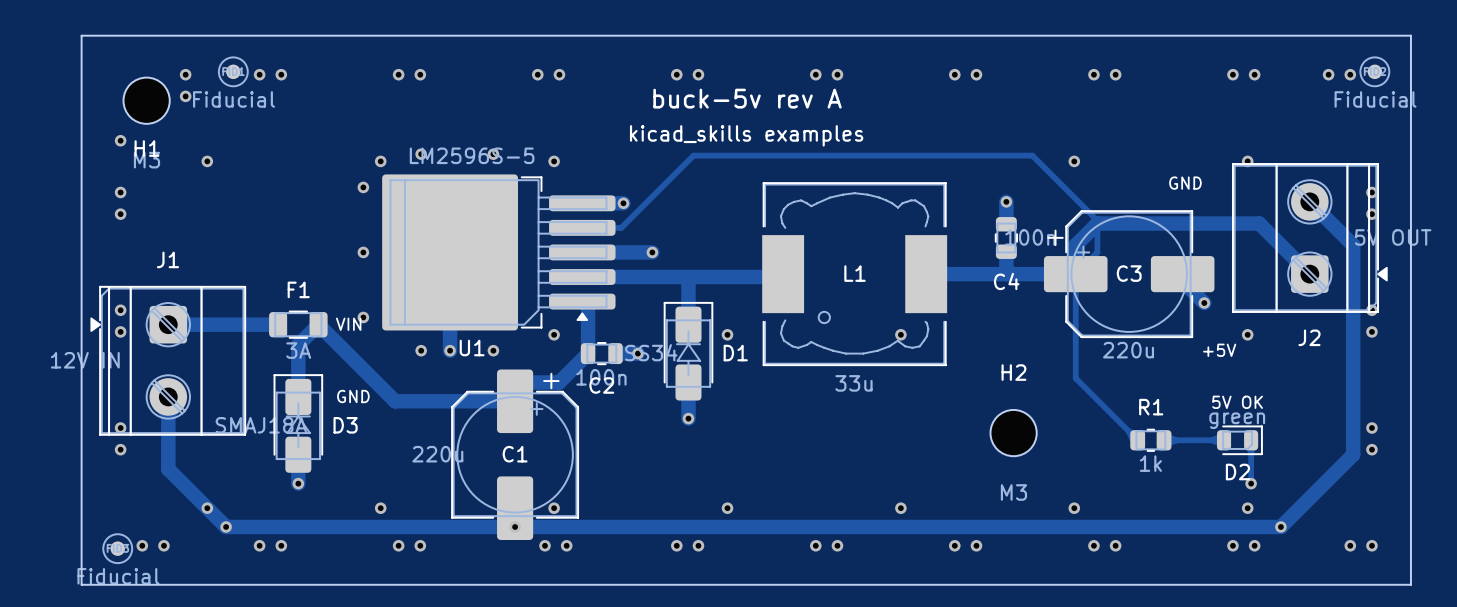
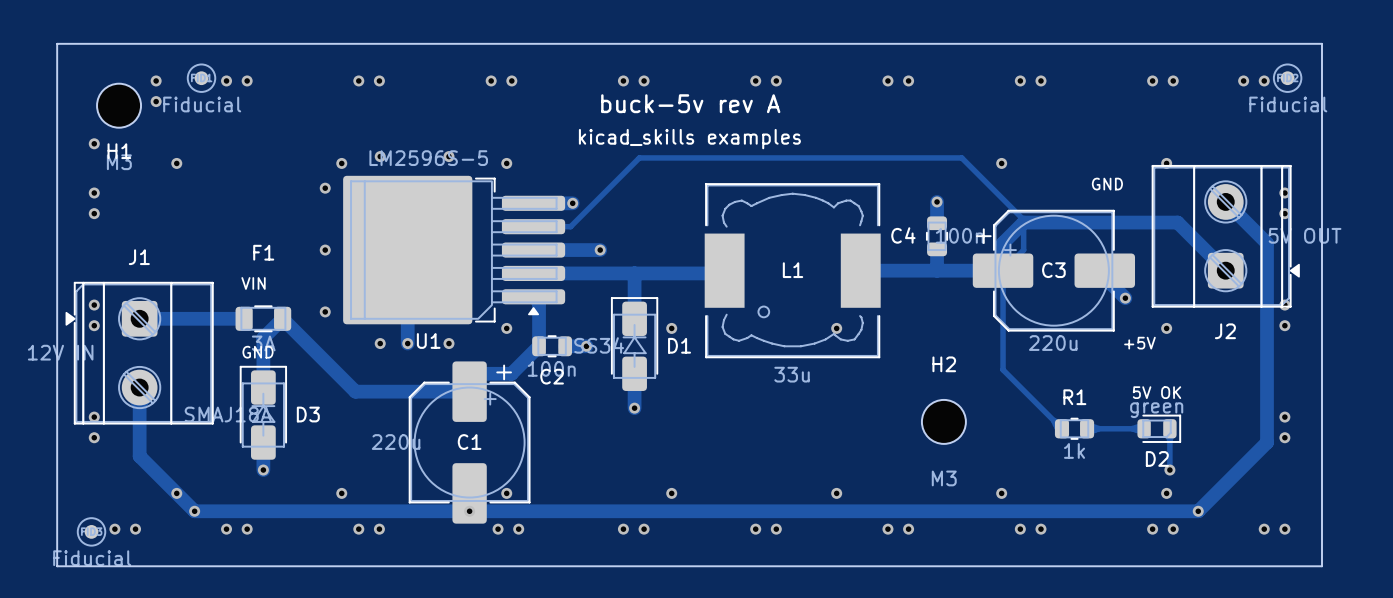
C4 name position: C4 (1006, 281) -> C4 (903, 235)
F1 name position: F1 (298, 289) -> F1 (263, 252)
text position: VIN (348, 324) -> VIN (253, 283)
text position: GND (353, 396) -> GND (257, 352)

